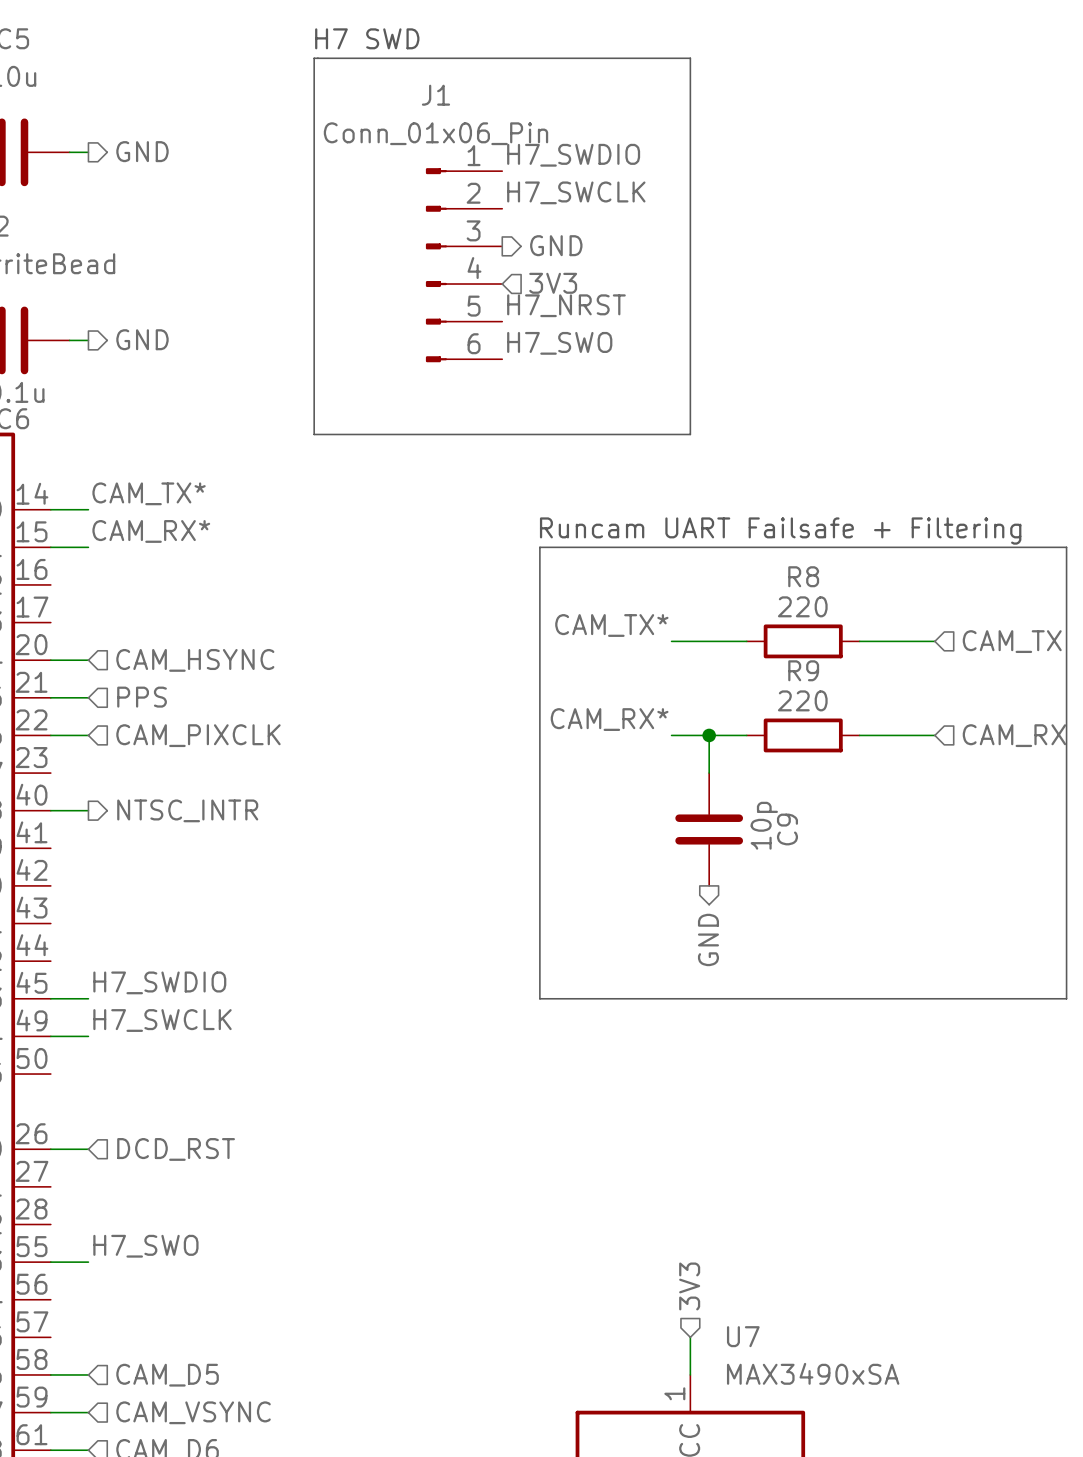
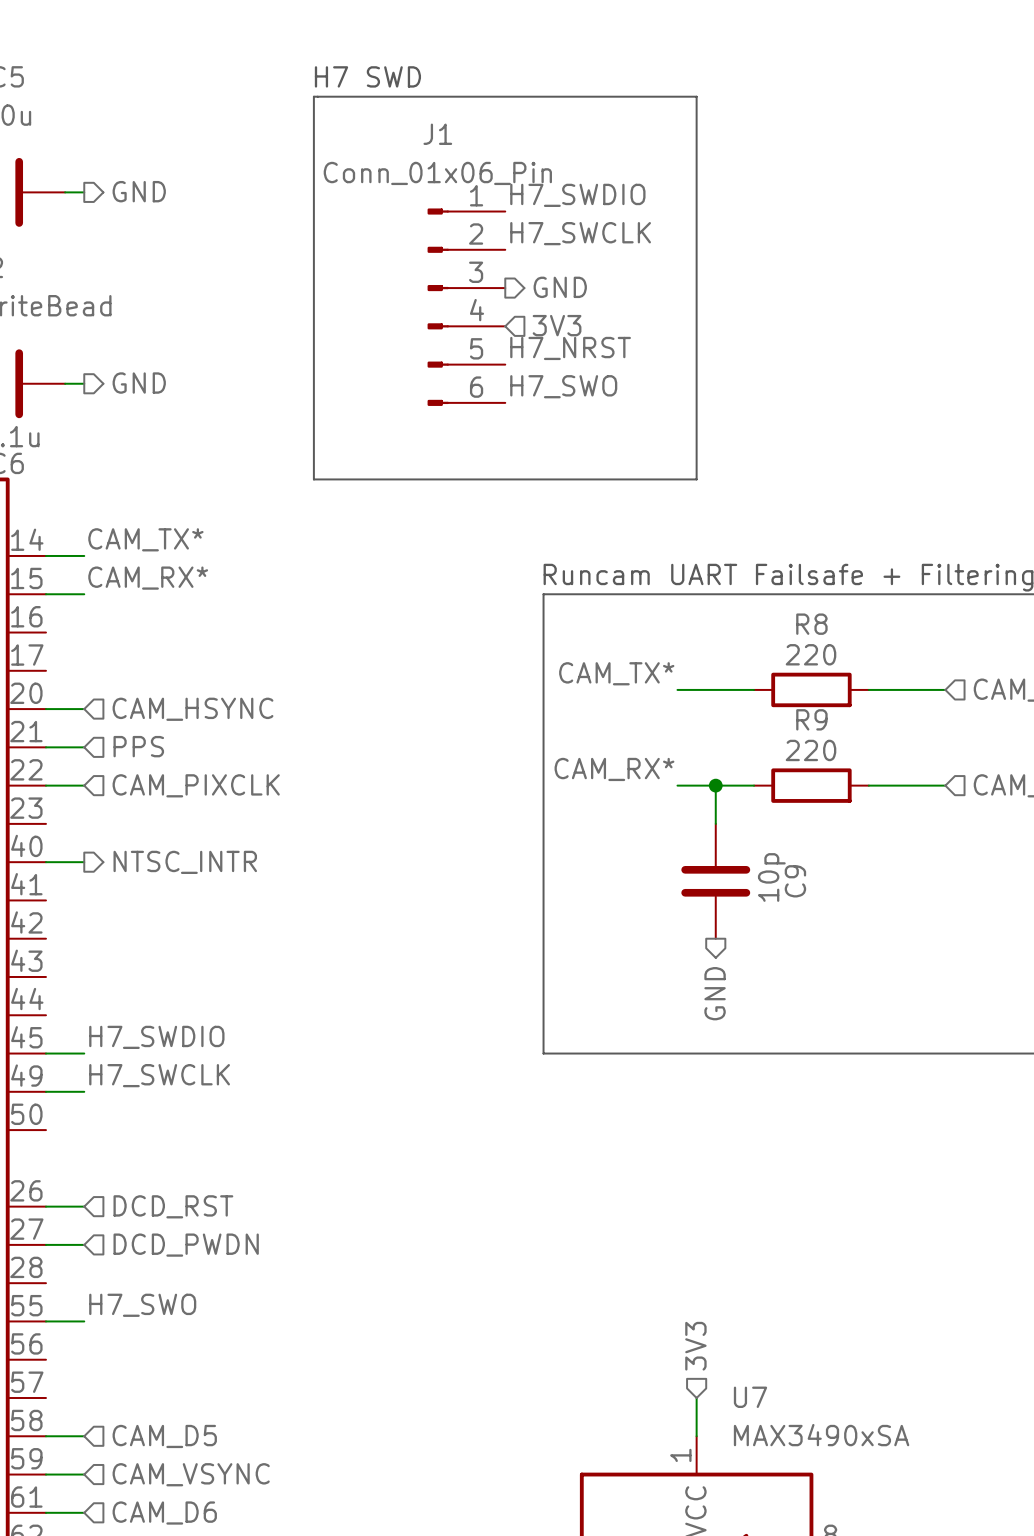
wire: none -> (45, 1244) (84, 1244)
hierarchical label: none -> DCD_PWDN (186, 1245)

